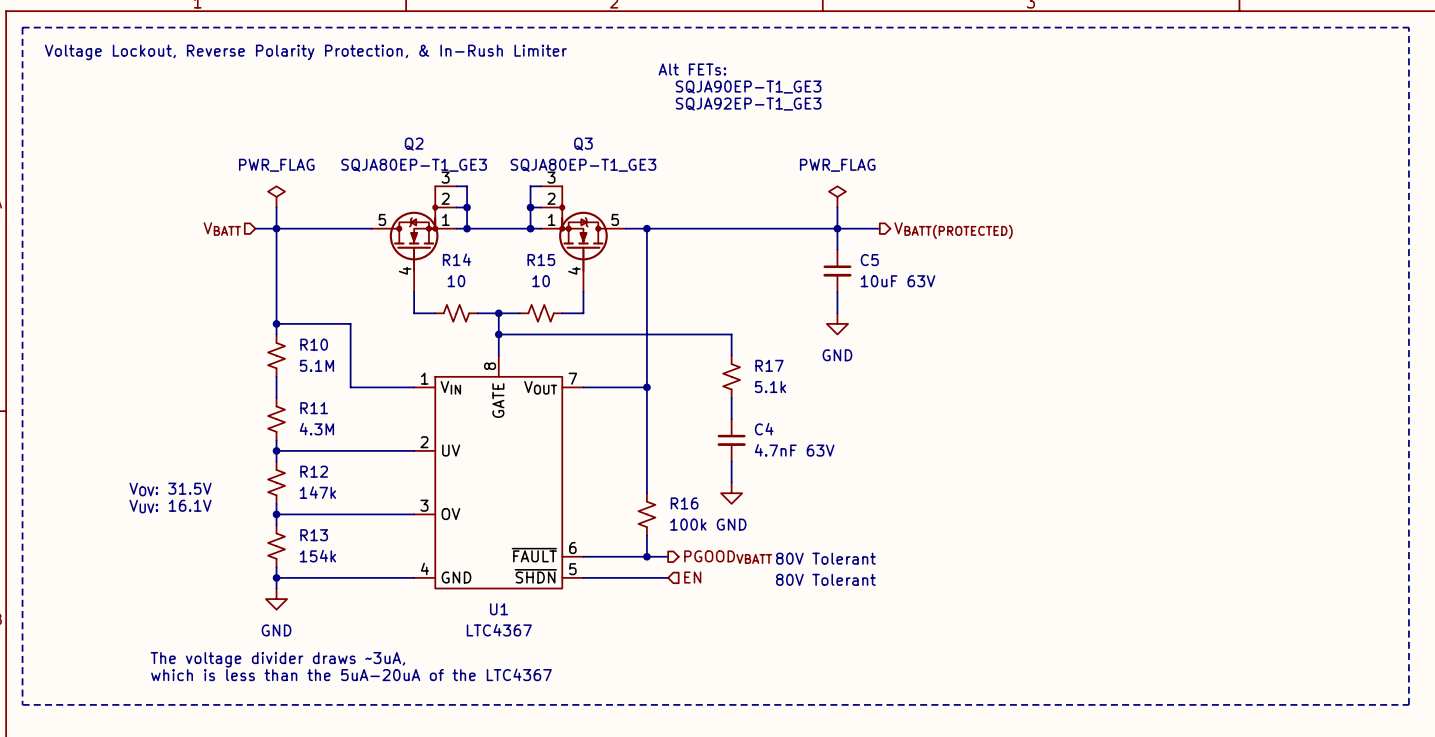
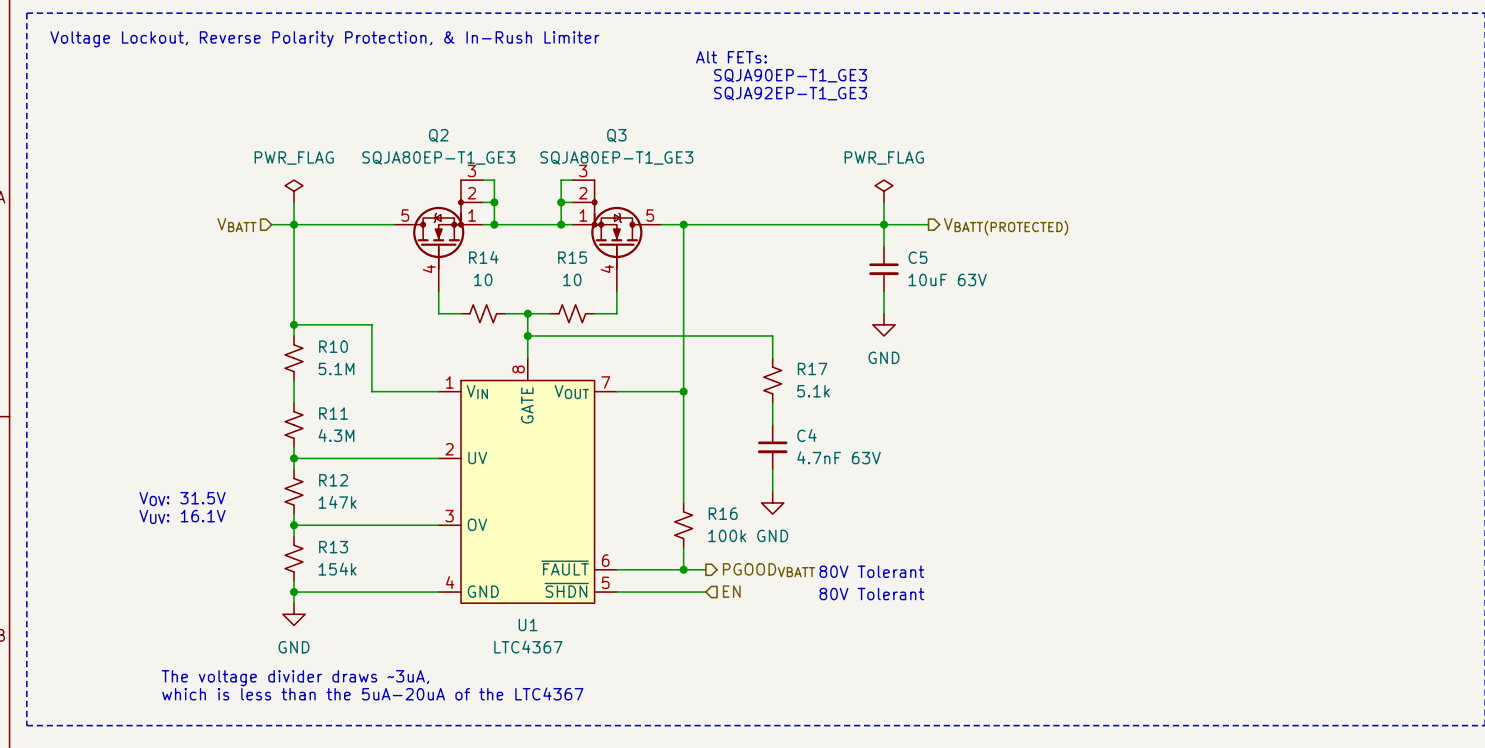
U1 symbol: [414, 355, 584, 590] -> [438, 358, 617, 604]

